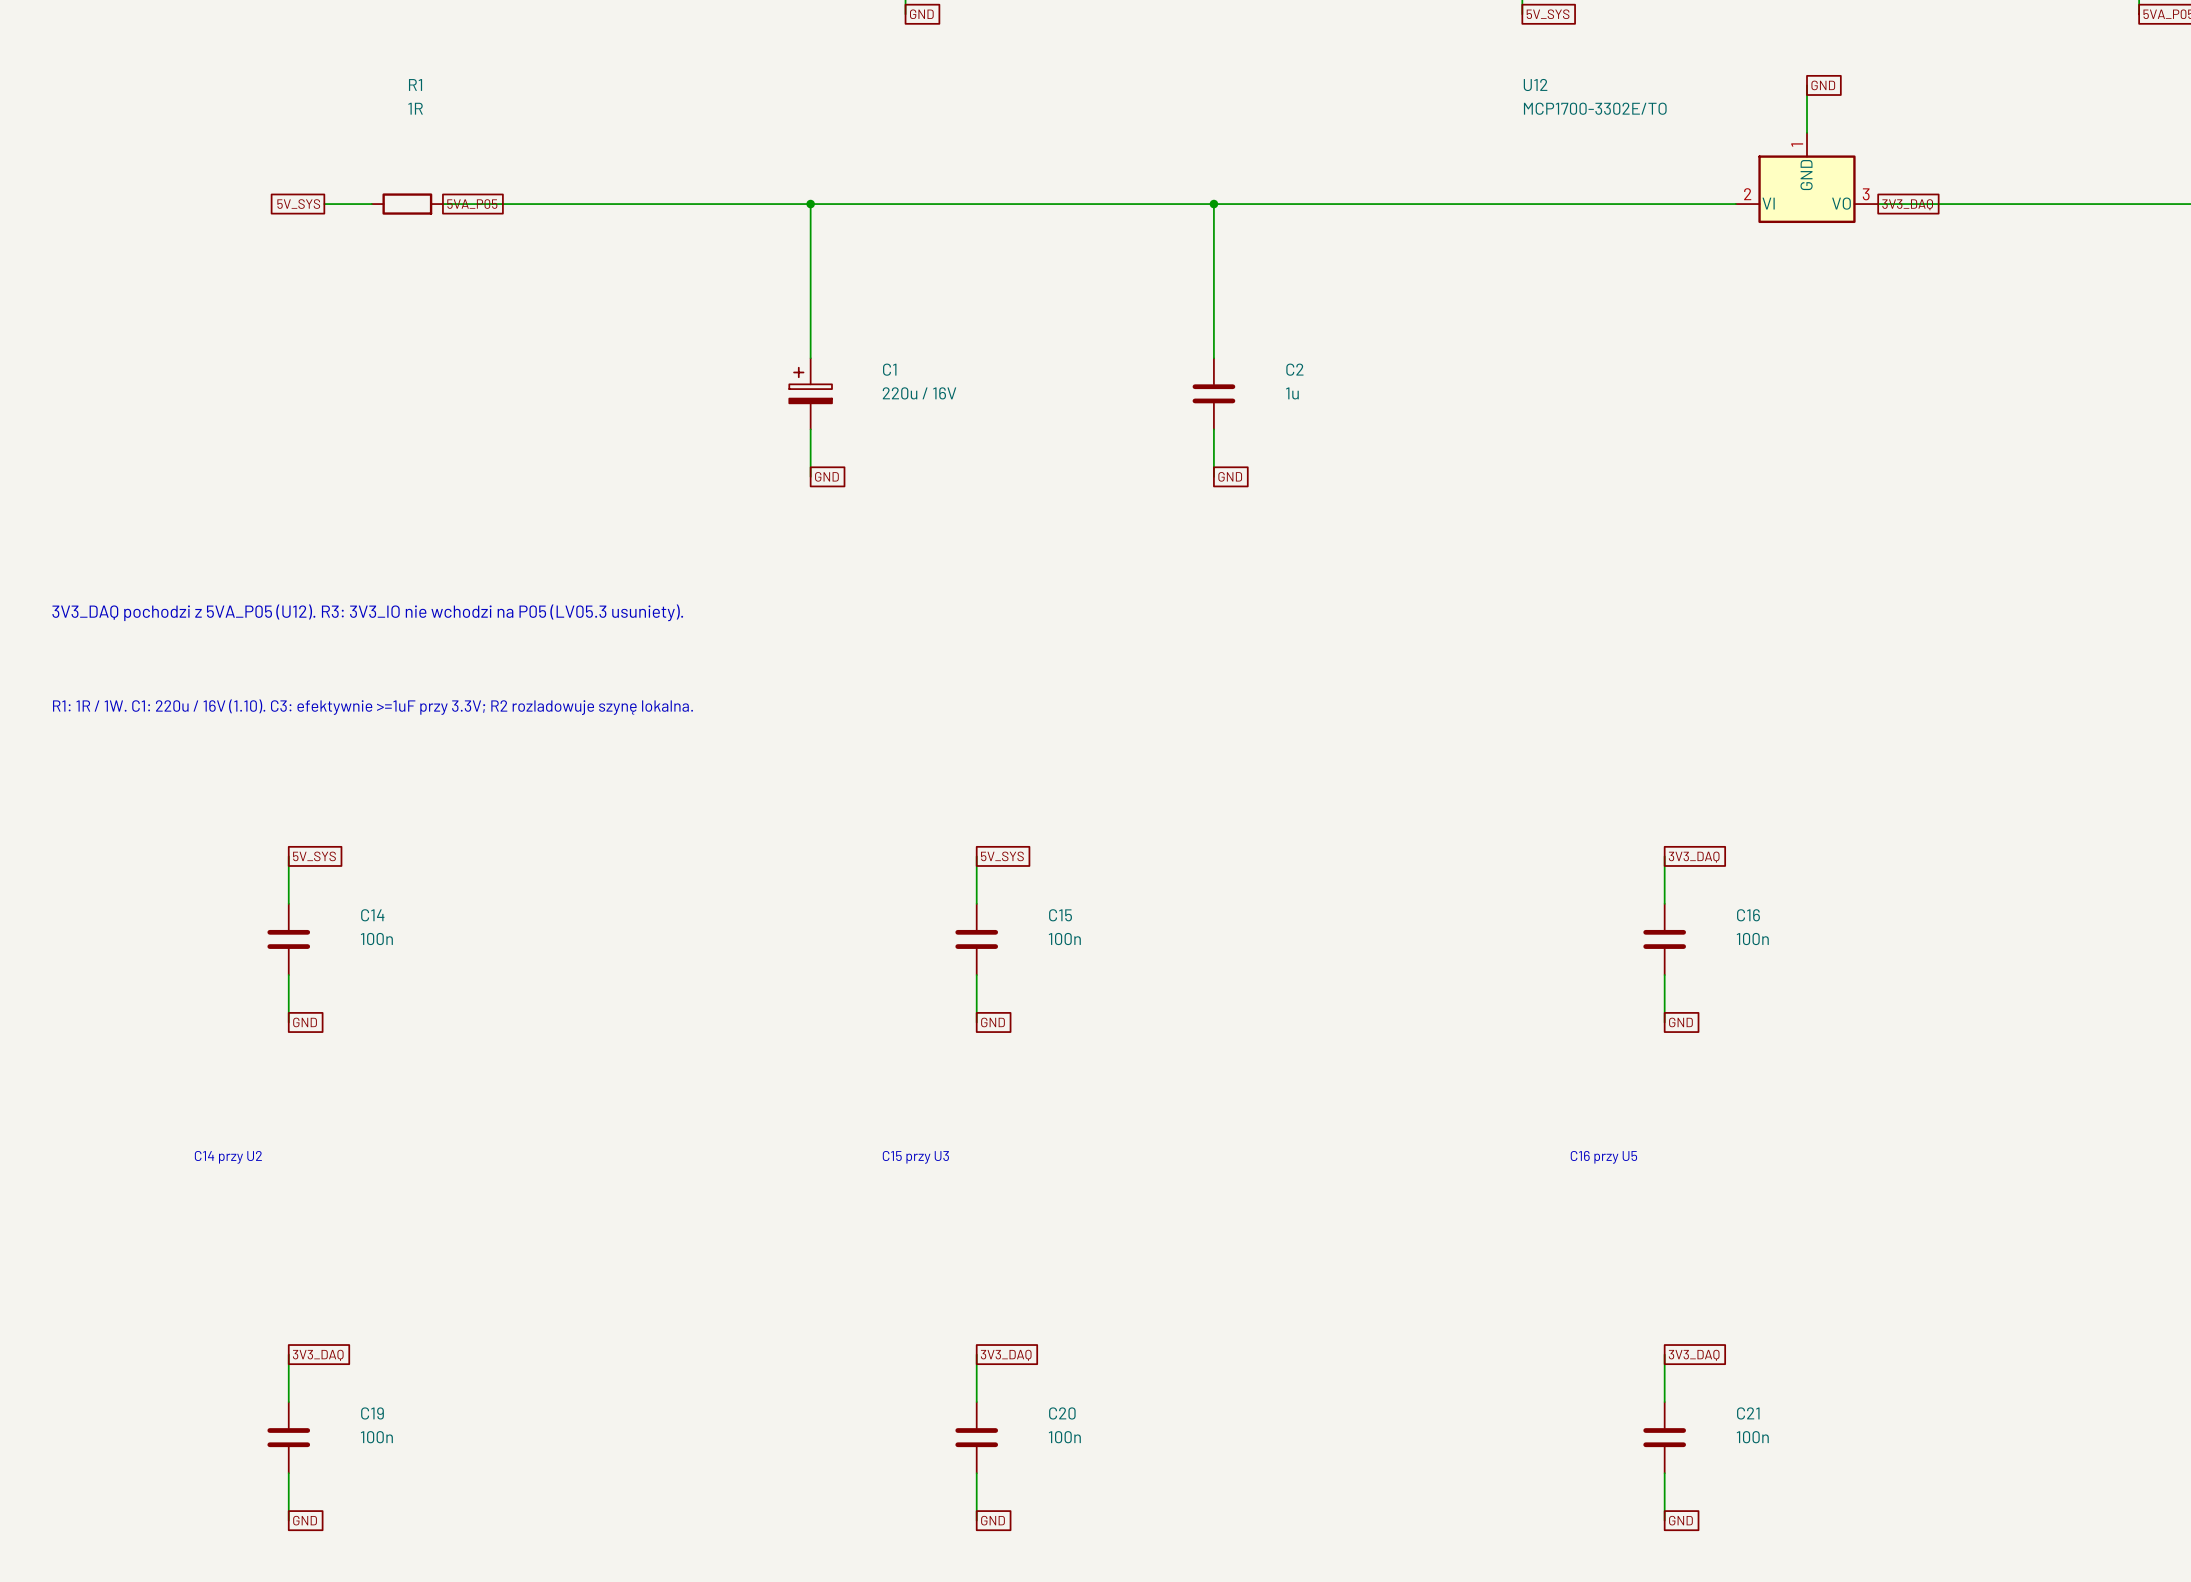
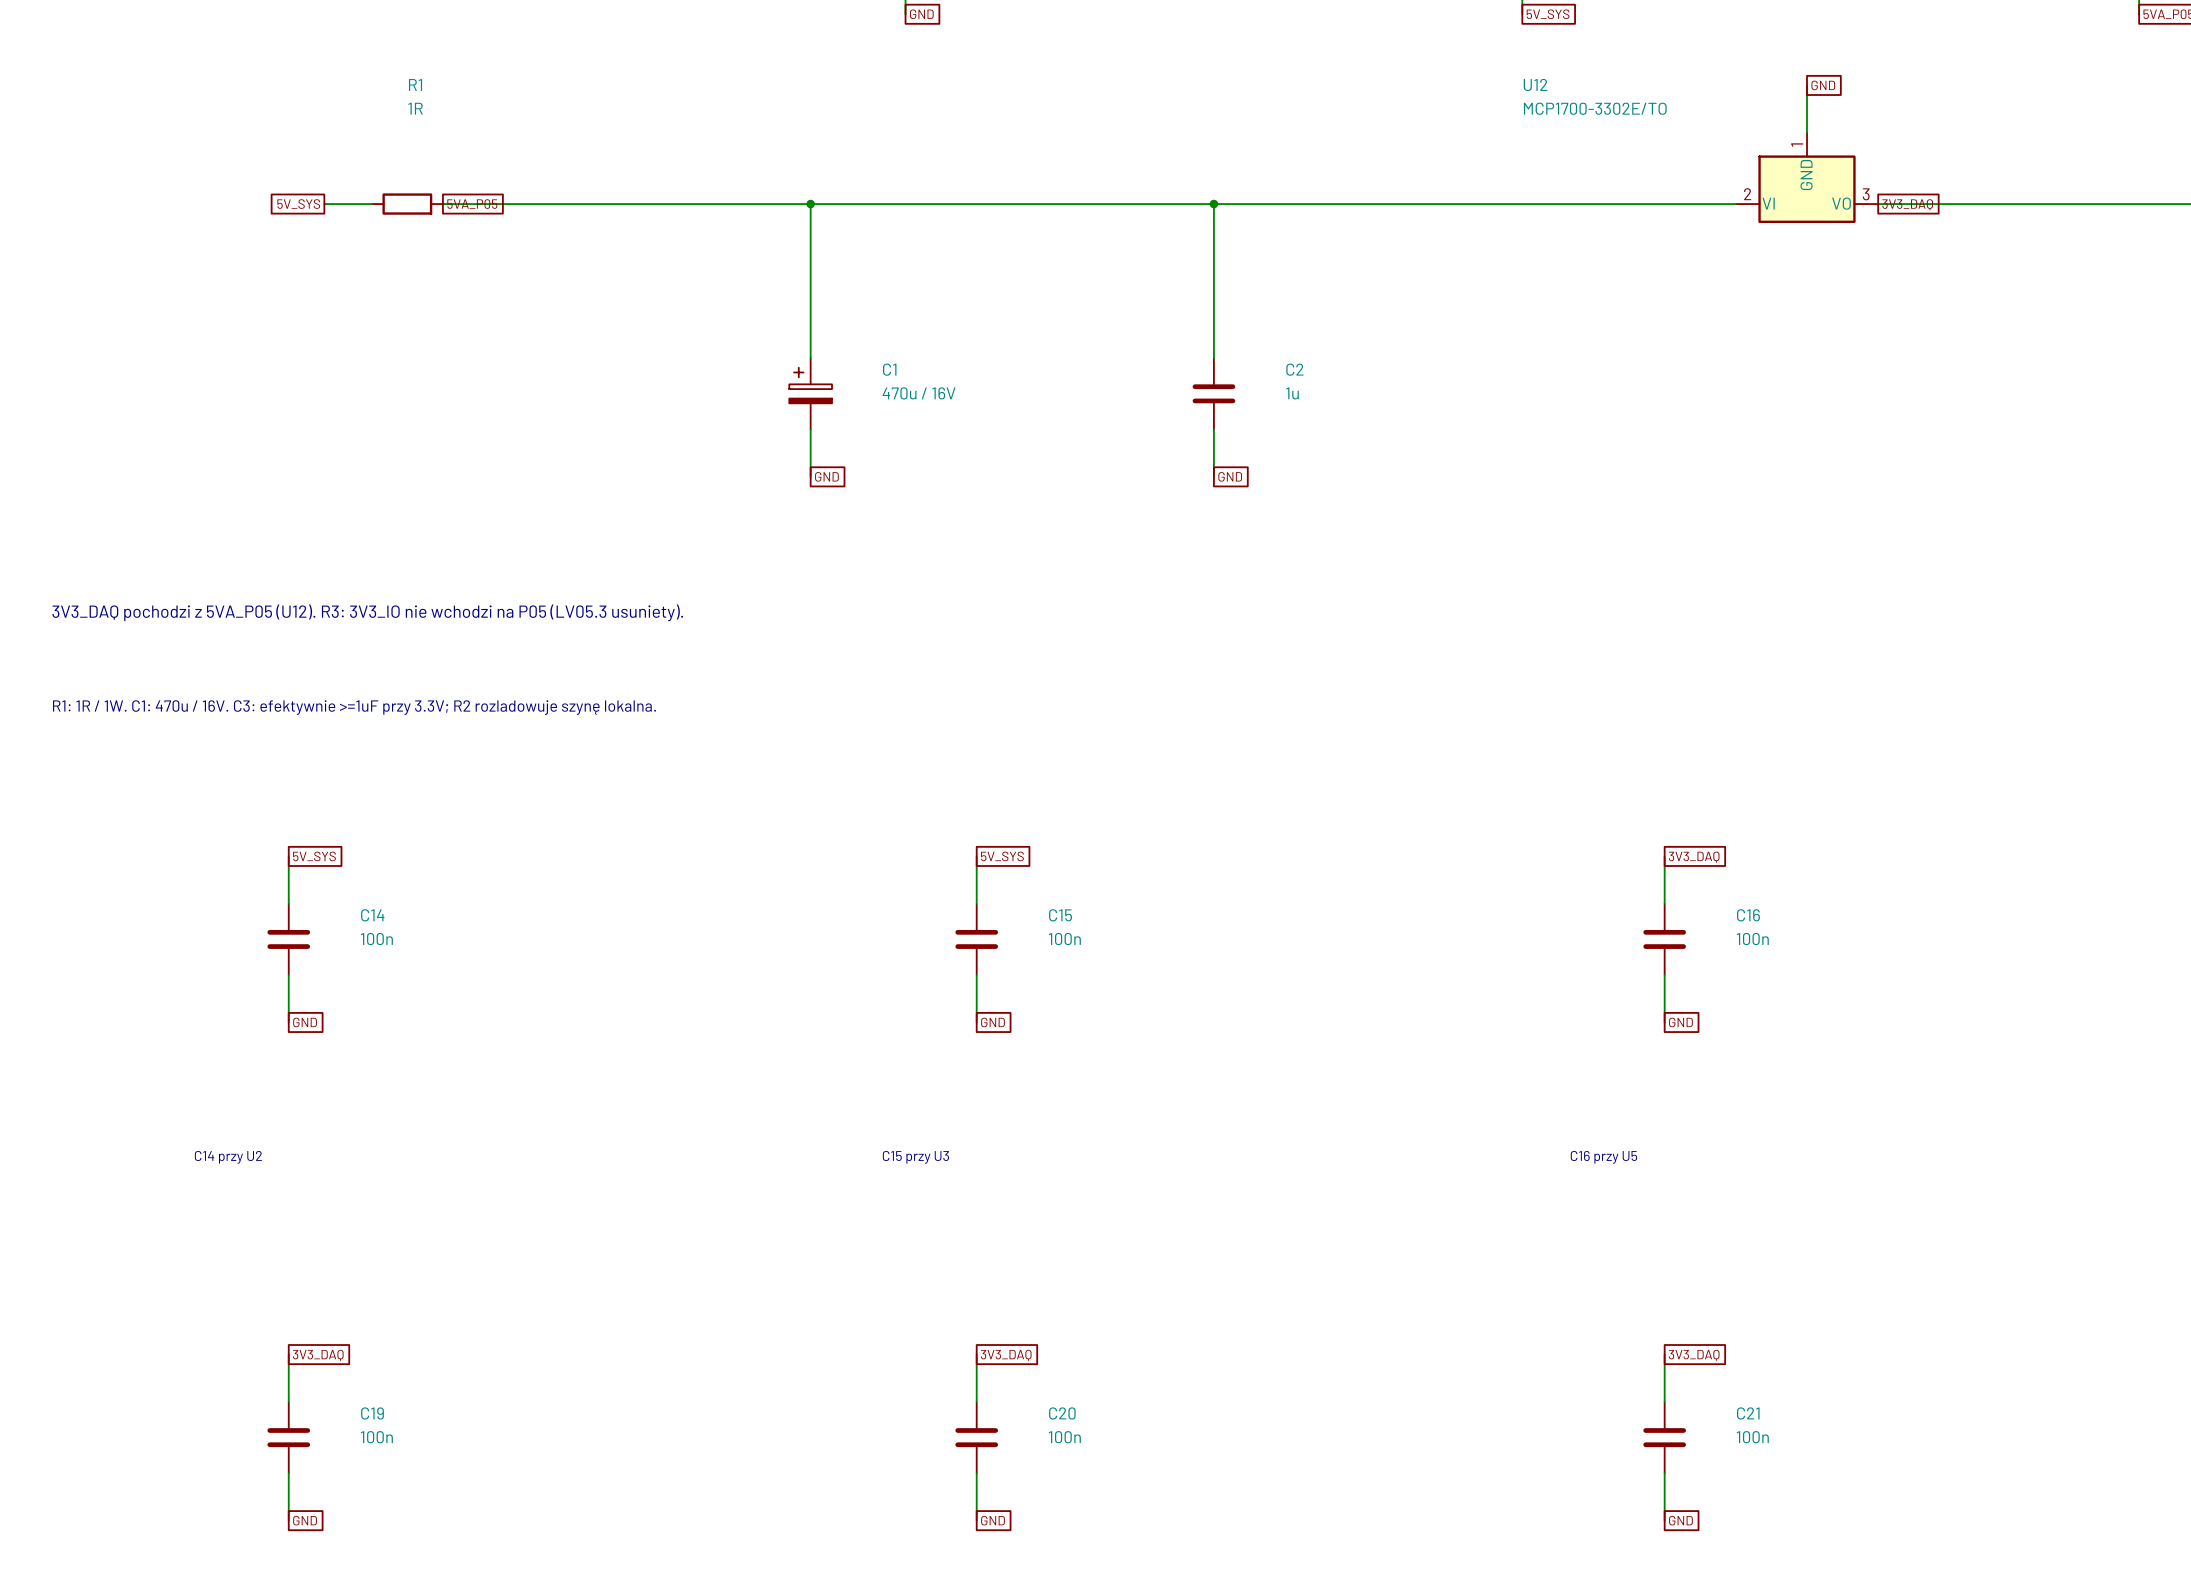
C1 value: 220u / 16V (919, 393) -> 470u / 16V (919, 393)
text: R1: 1R / 1W. C1: 220u / 16V (1.10). C3: efektywnie >=1uF przy 3.3V; R2 rozladowuje szynę lokalna. (373, 707) -> R1: 1R / 1W. C1: 470u / 16V. C3: efektywnie >=1uF przy 3.3V; R2 rozladowuje szynę lokalna. (354, 707)

